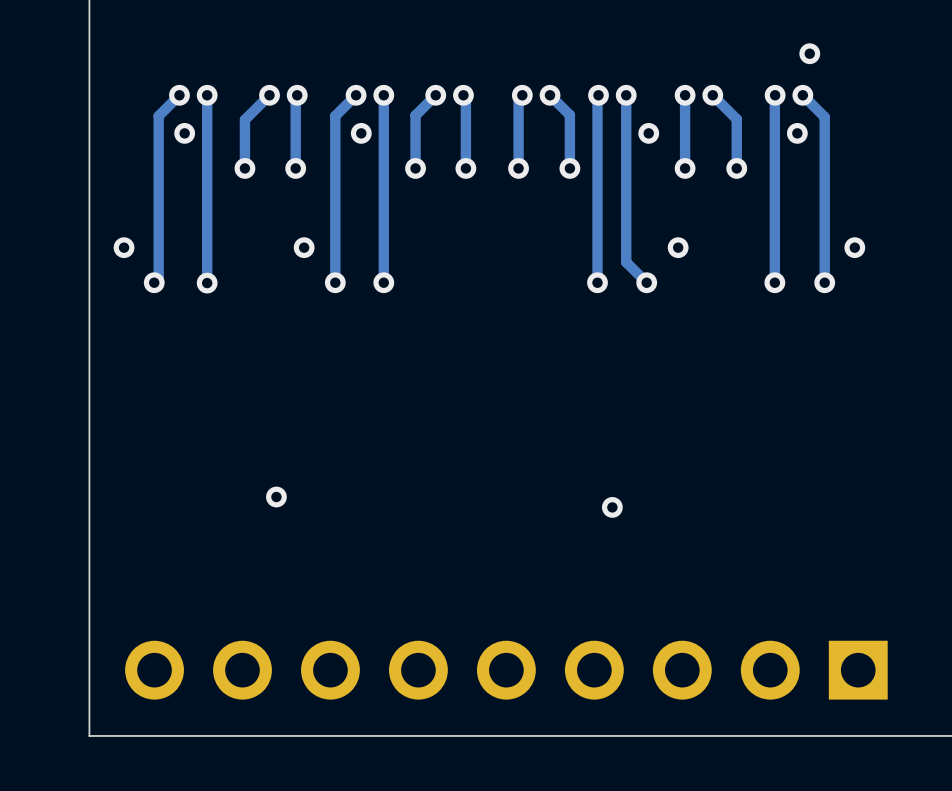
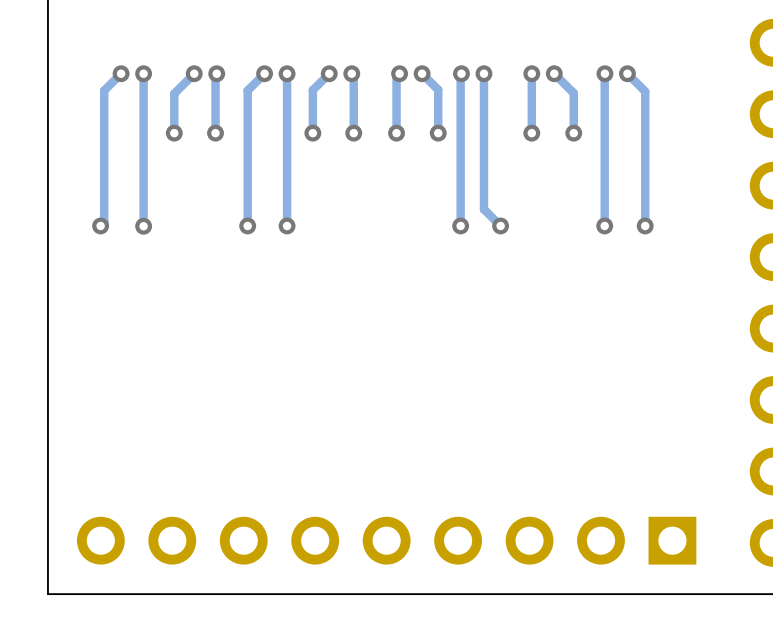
via: (809, 53) -> none
via: (184, 133) -> none
via: (361, 133) -> none
via: (648, 133) -> none
via: (797, 133) -> none
via: (124, 247) -> none
via: (304, 247) -> none
via: (678, 247) -> none
via: (854, 247) -> none
via: (276, 497) -> none
via: (612, 507) -> none

